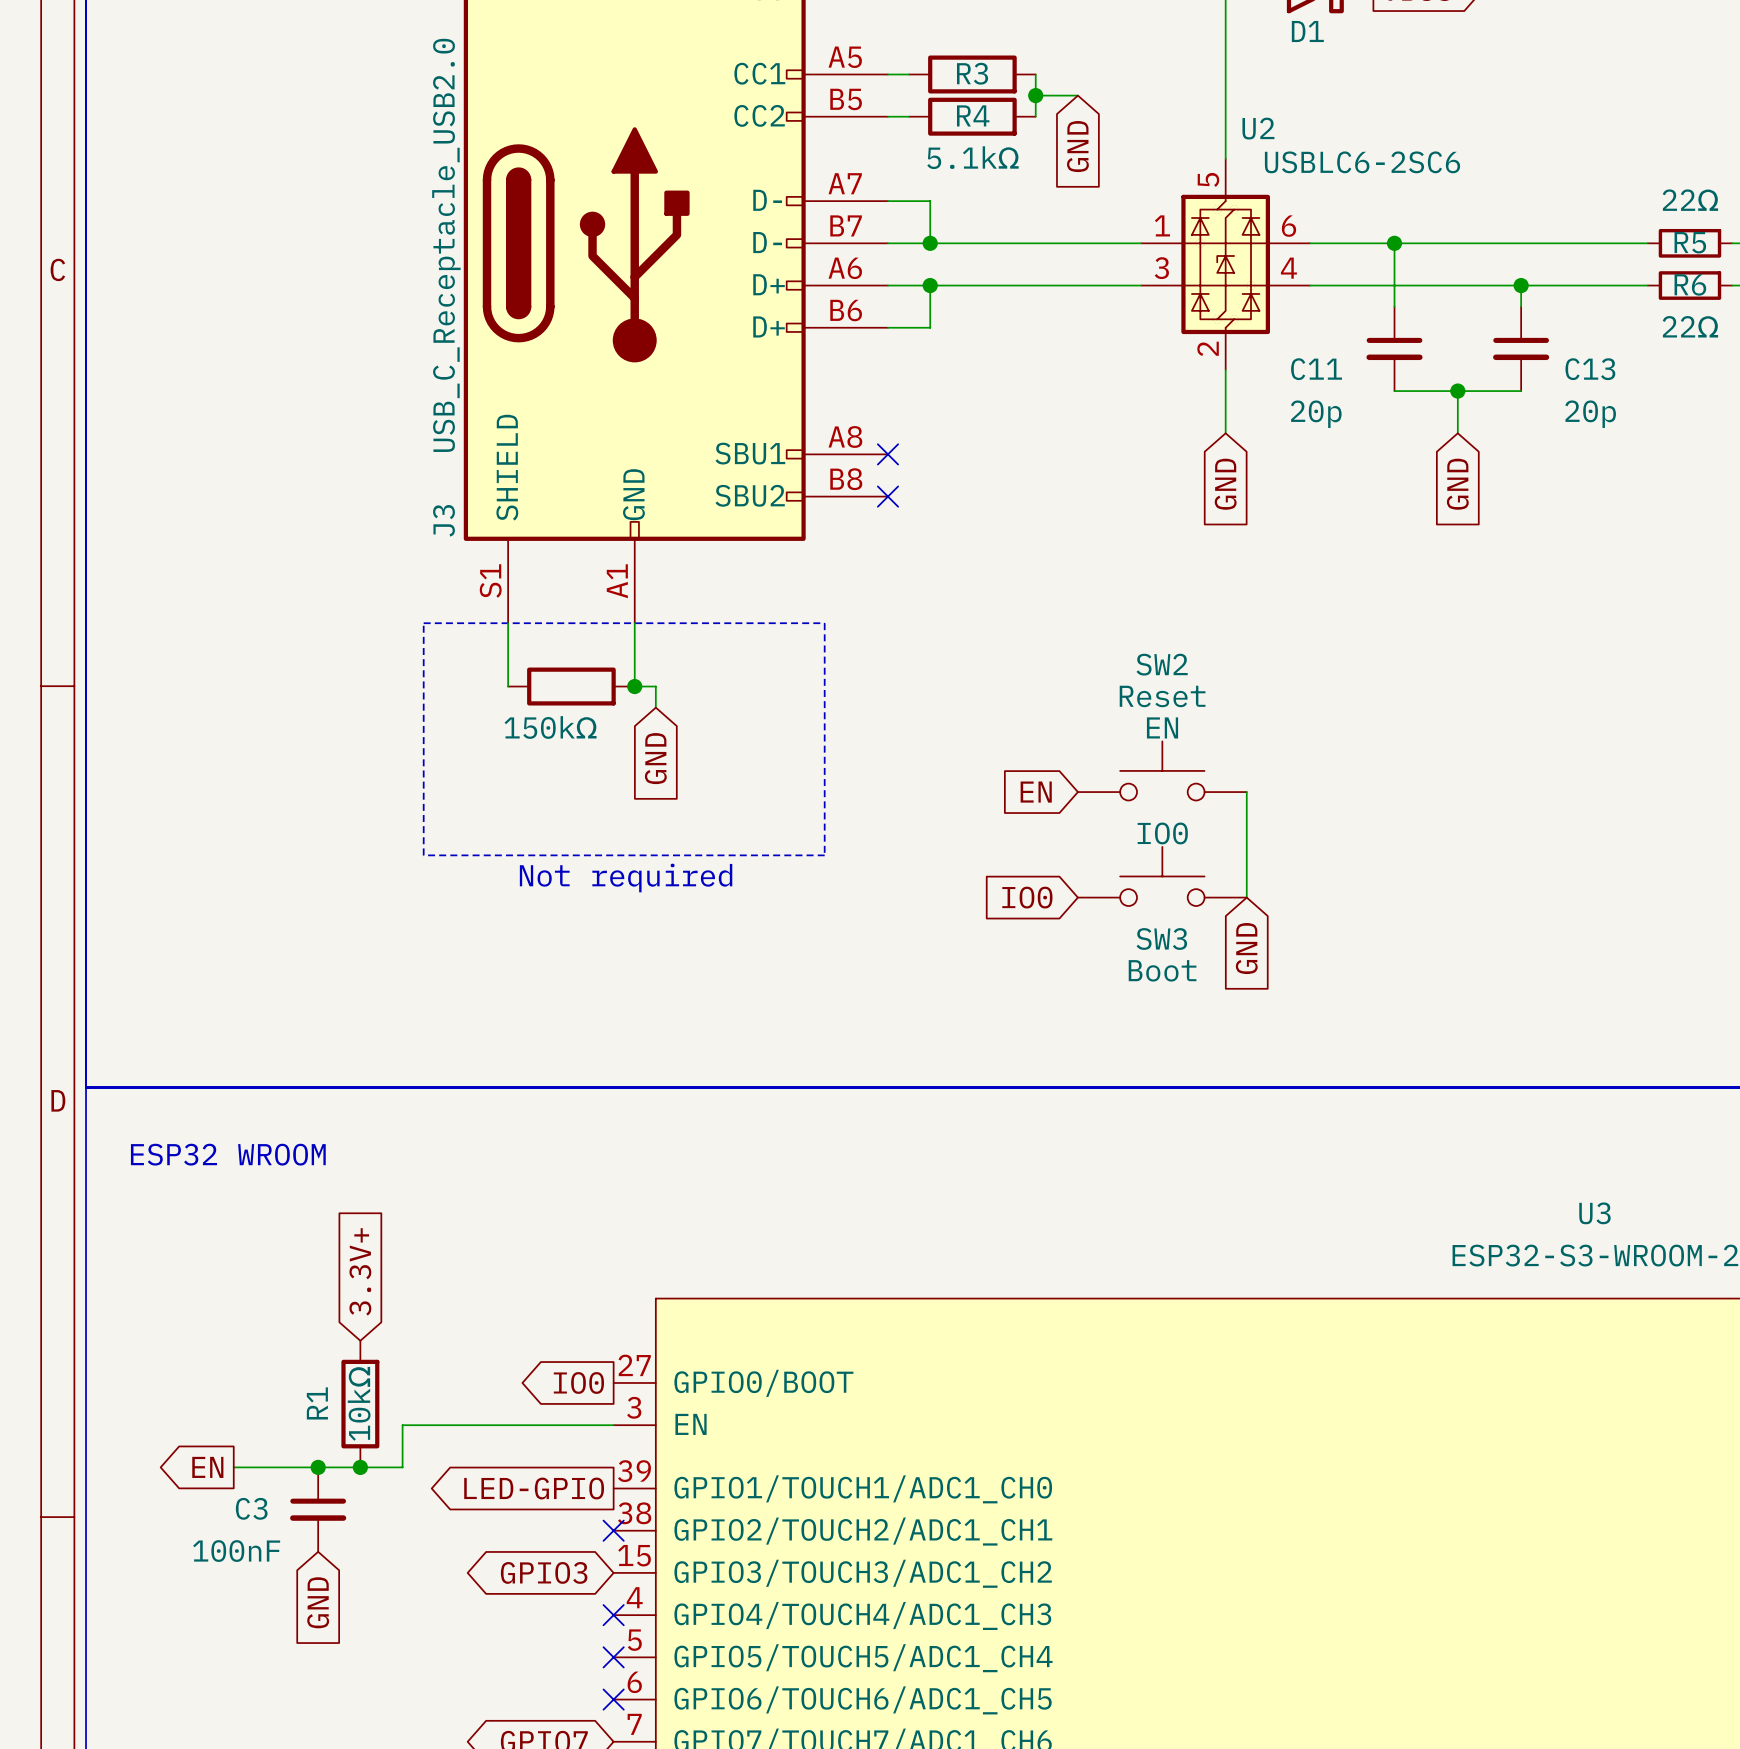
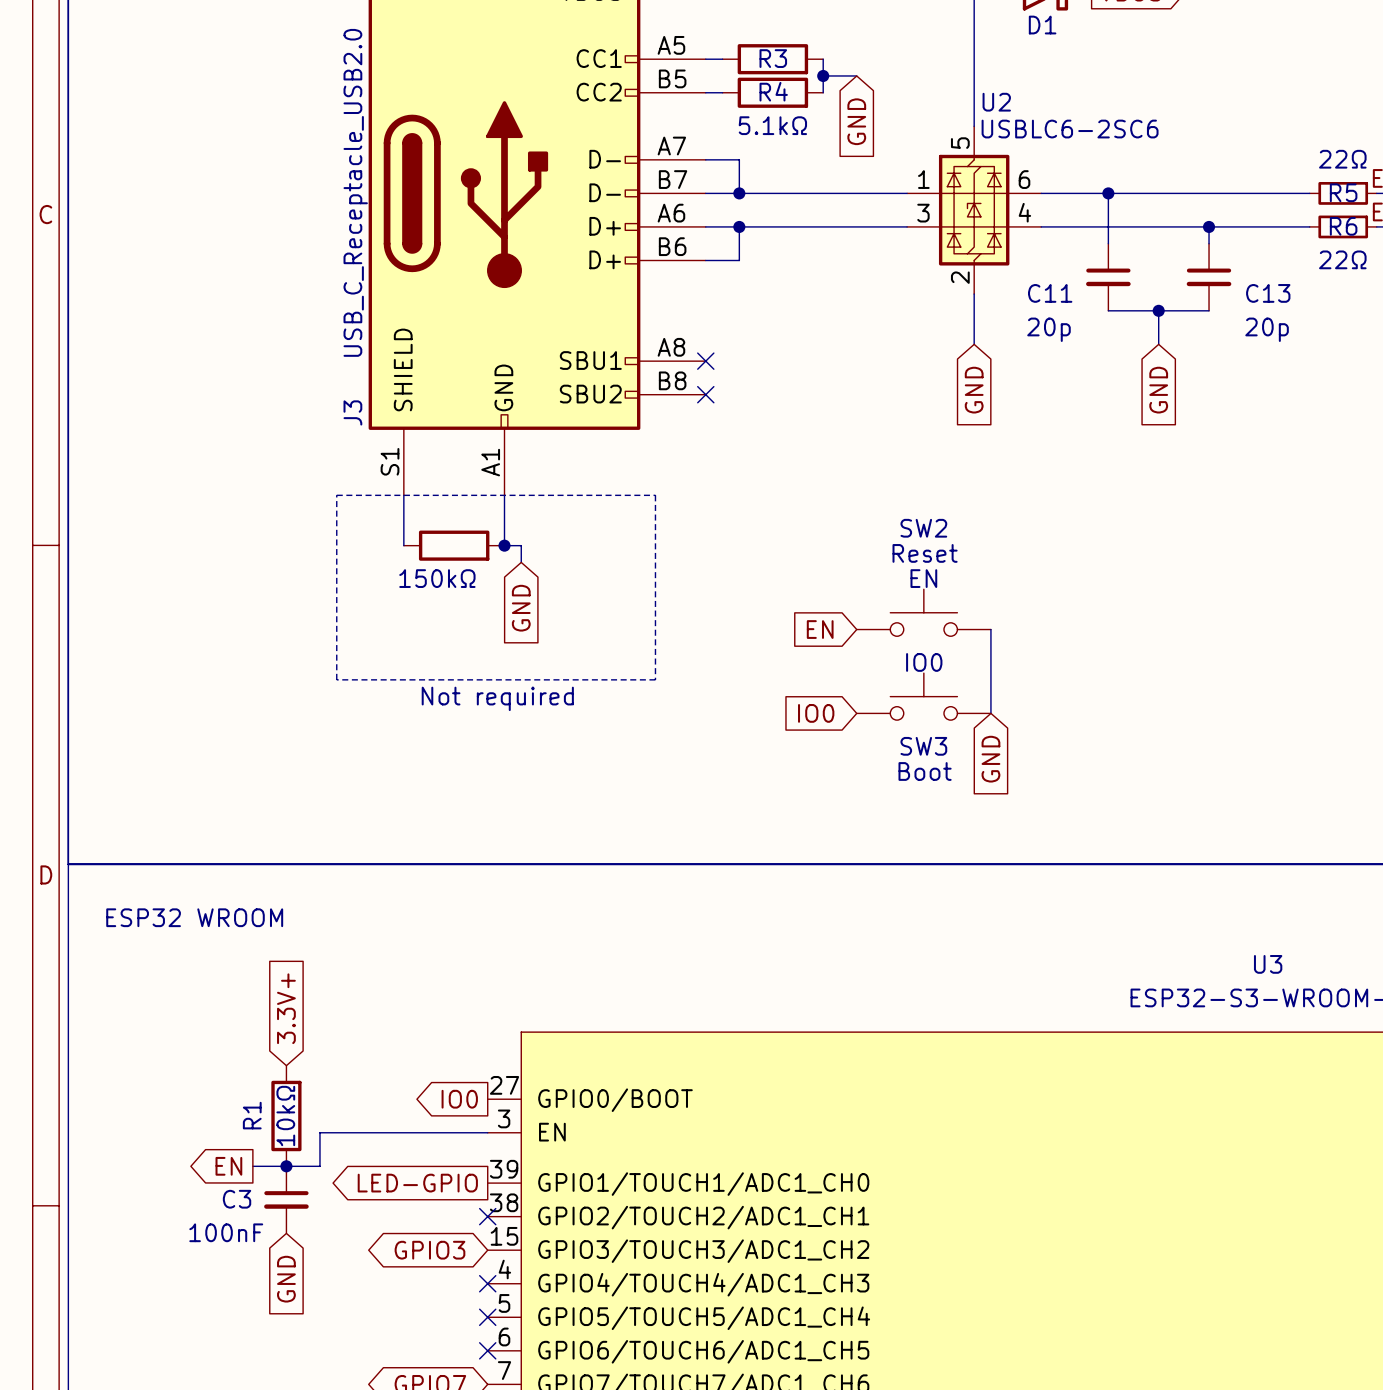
global label position: EN (207, 1467) -> EN (228, 1166)
wire: (233, 1467) (318, 1467) -> none
junction: (318, 1467) -> none
C3 position: (318, 1509) -> (286, 1199)
global label position: GND (318, 1602) -> GND (286, 1279)

